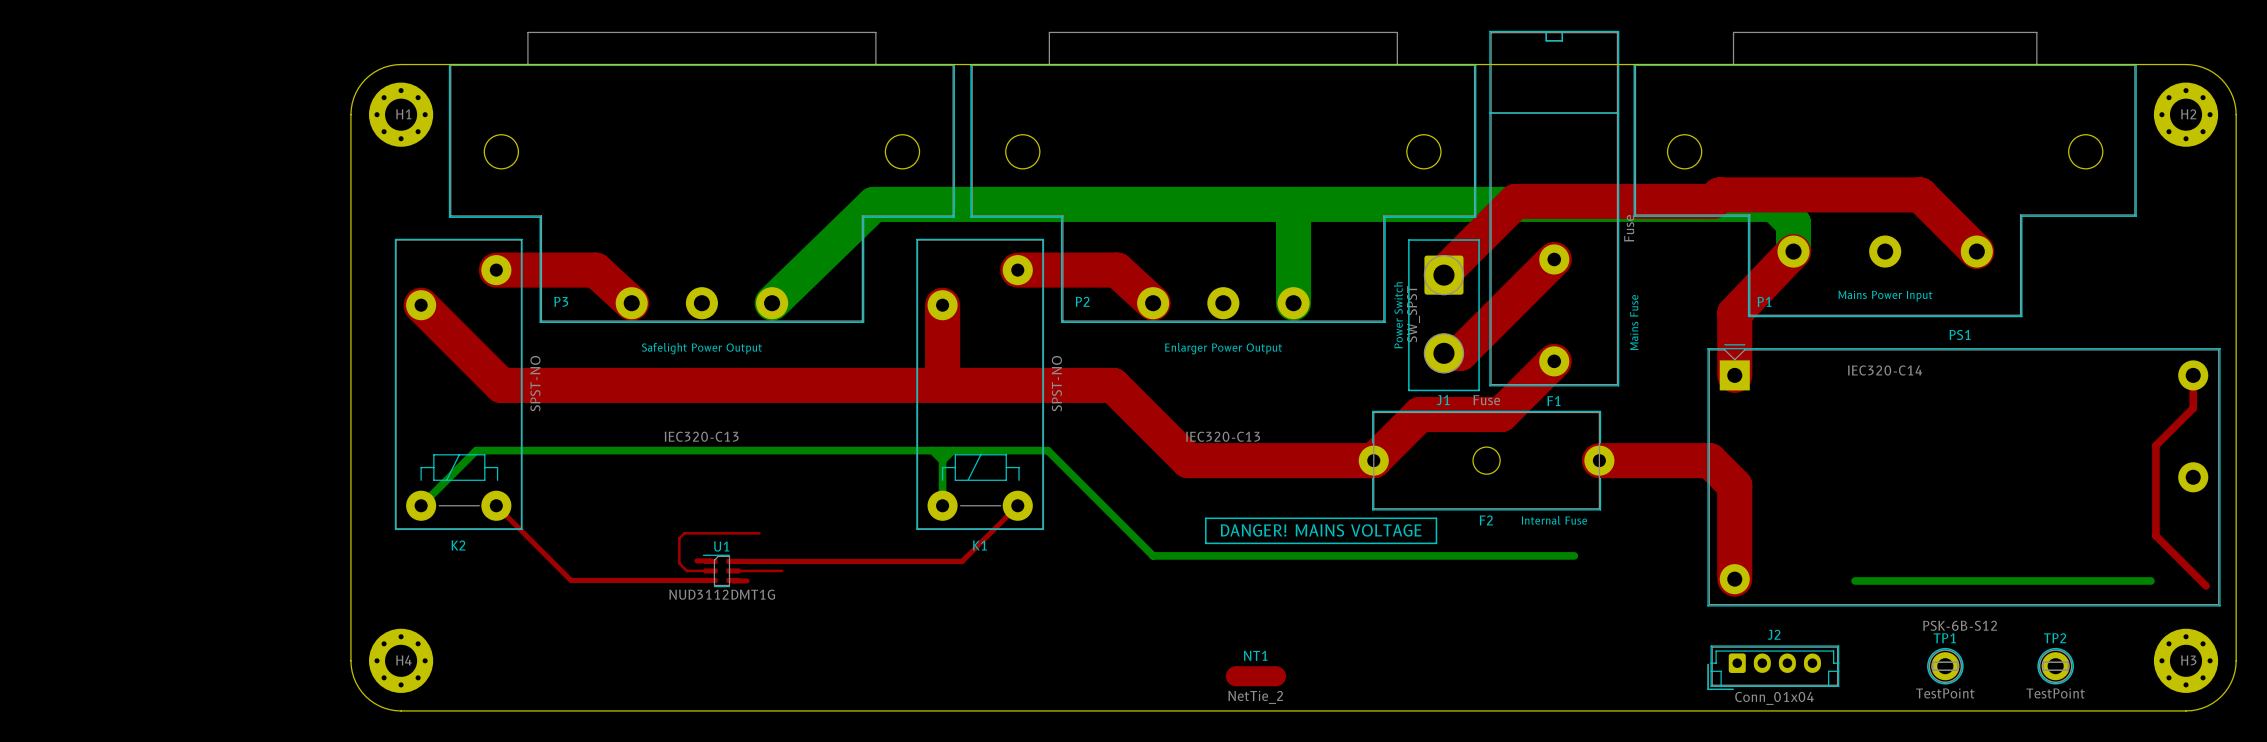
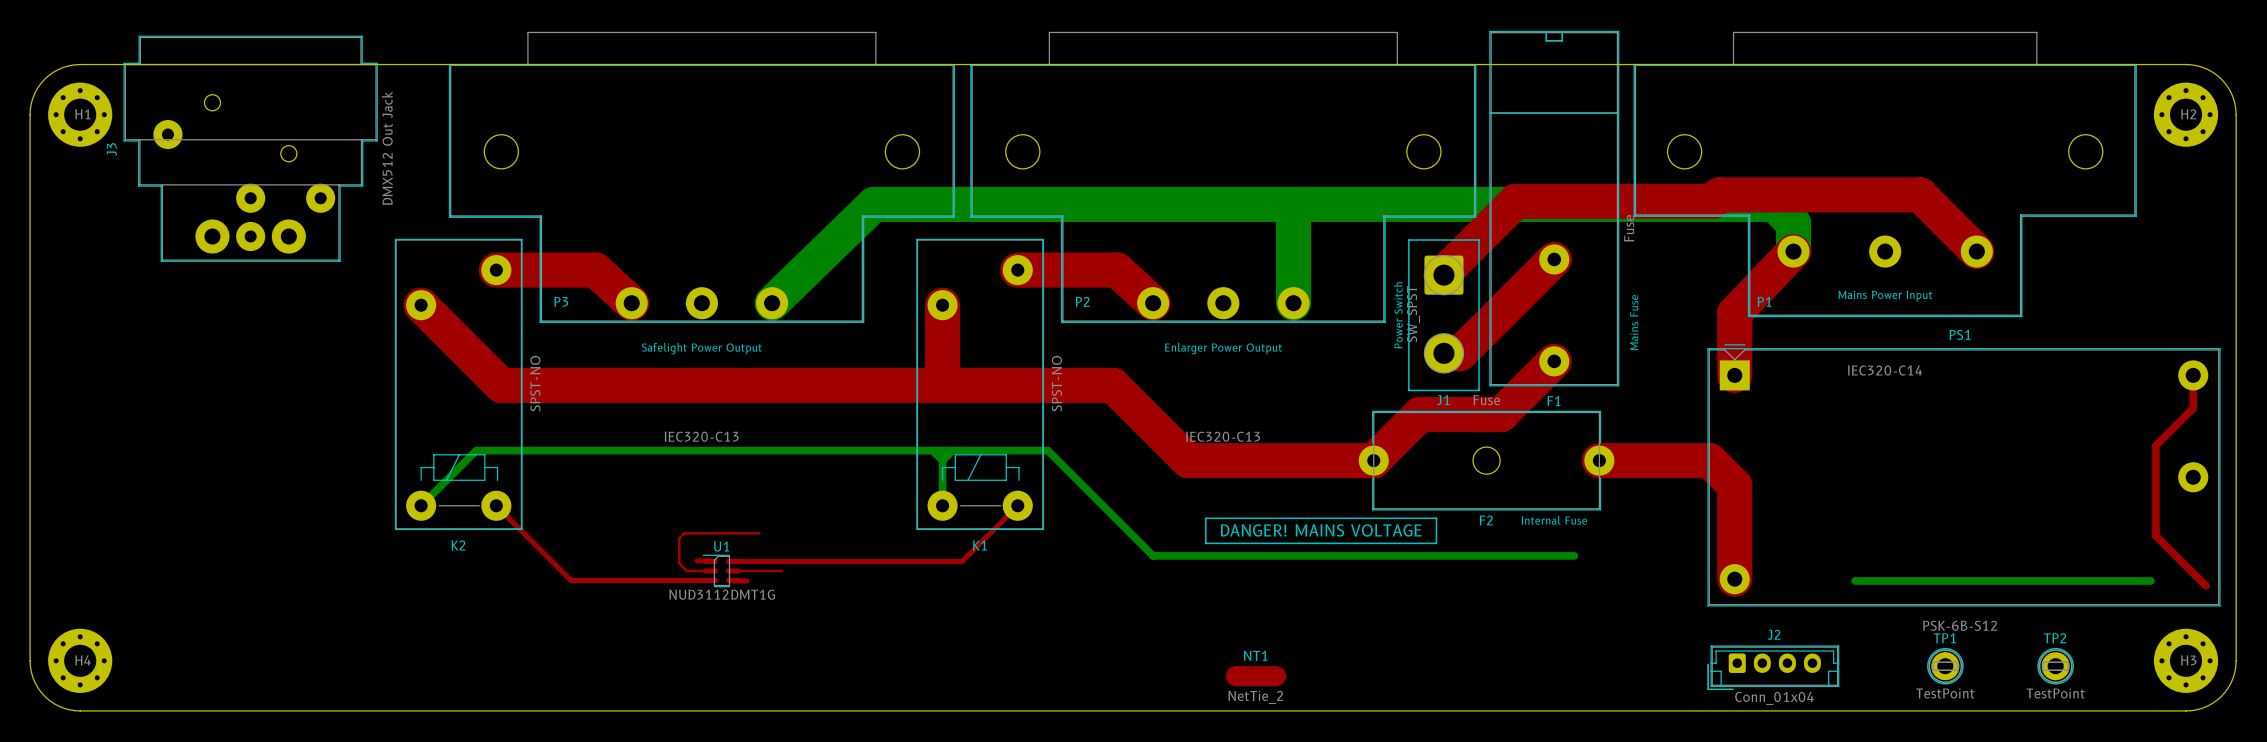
board edge: (401, 64) (379, 69) (365, 79) (355, 92) (350, 114) (351, 666) (355, 682) (365, 696) (379, 706) (401, 710) -> (401, 64) (74, 64) (53, 72) (41, 83) (32, 98) (30, 114) (30, 660) (32, 677) (37, 687) (53, 703) (74, 710) (401, 710)
H1 position: (401, 114) -> (80, 114)
J3: none -> DMX512 Out Jack (250, 148)
H4 position: (401, 660) -> (80, 660)

